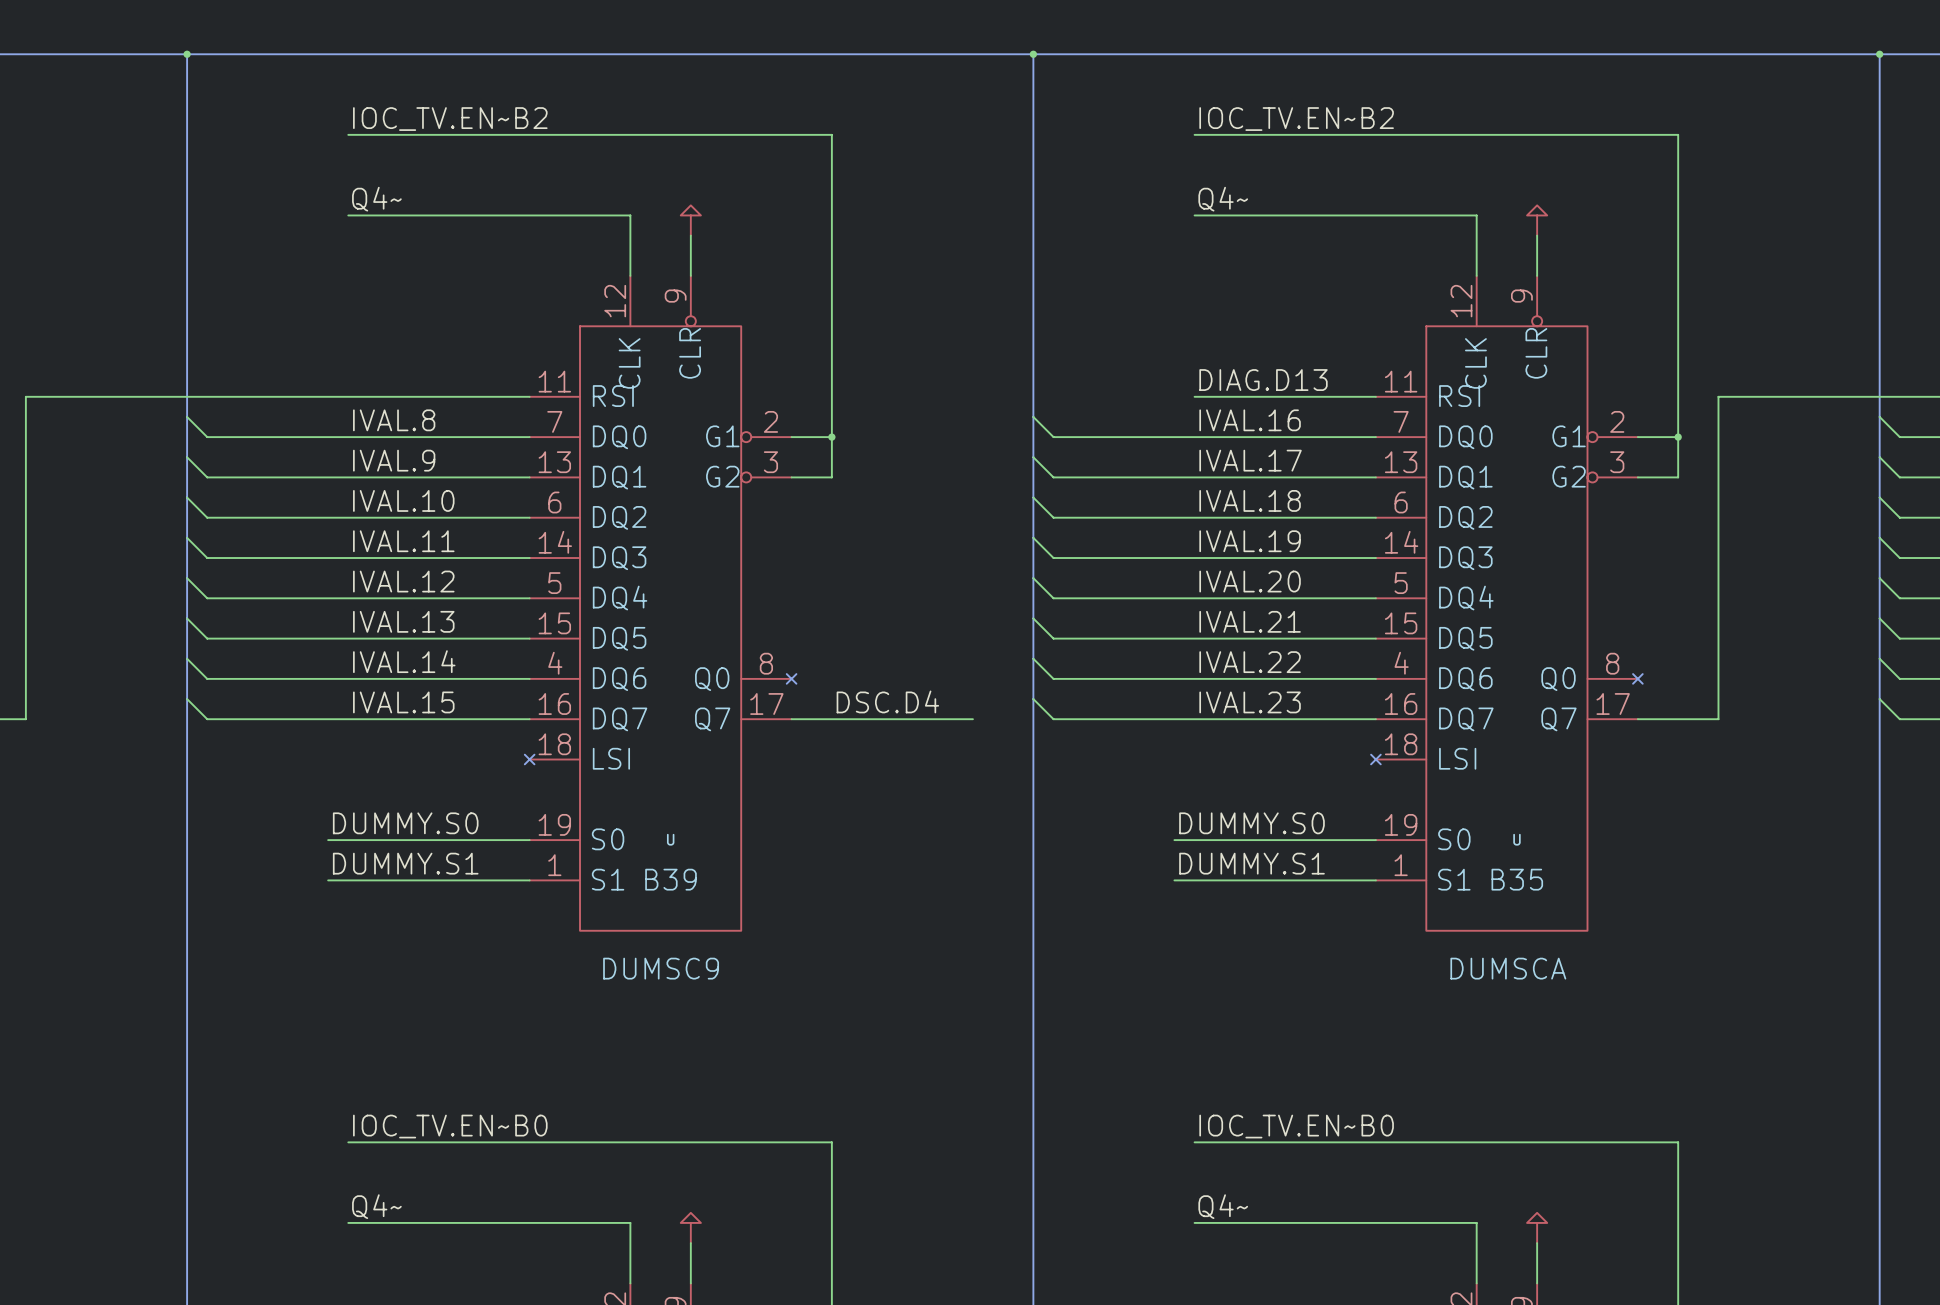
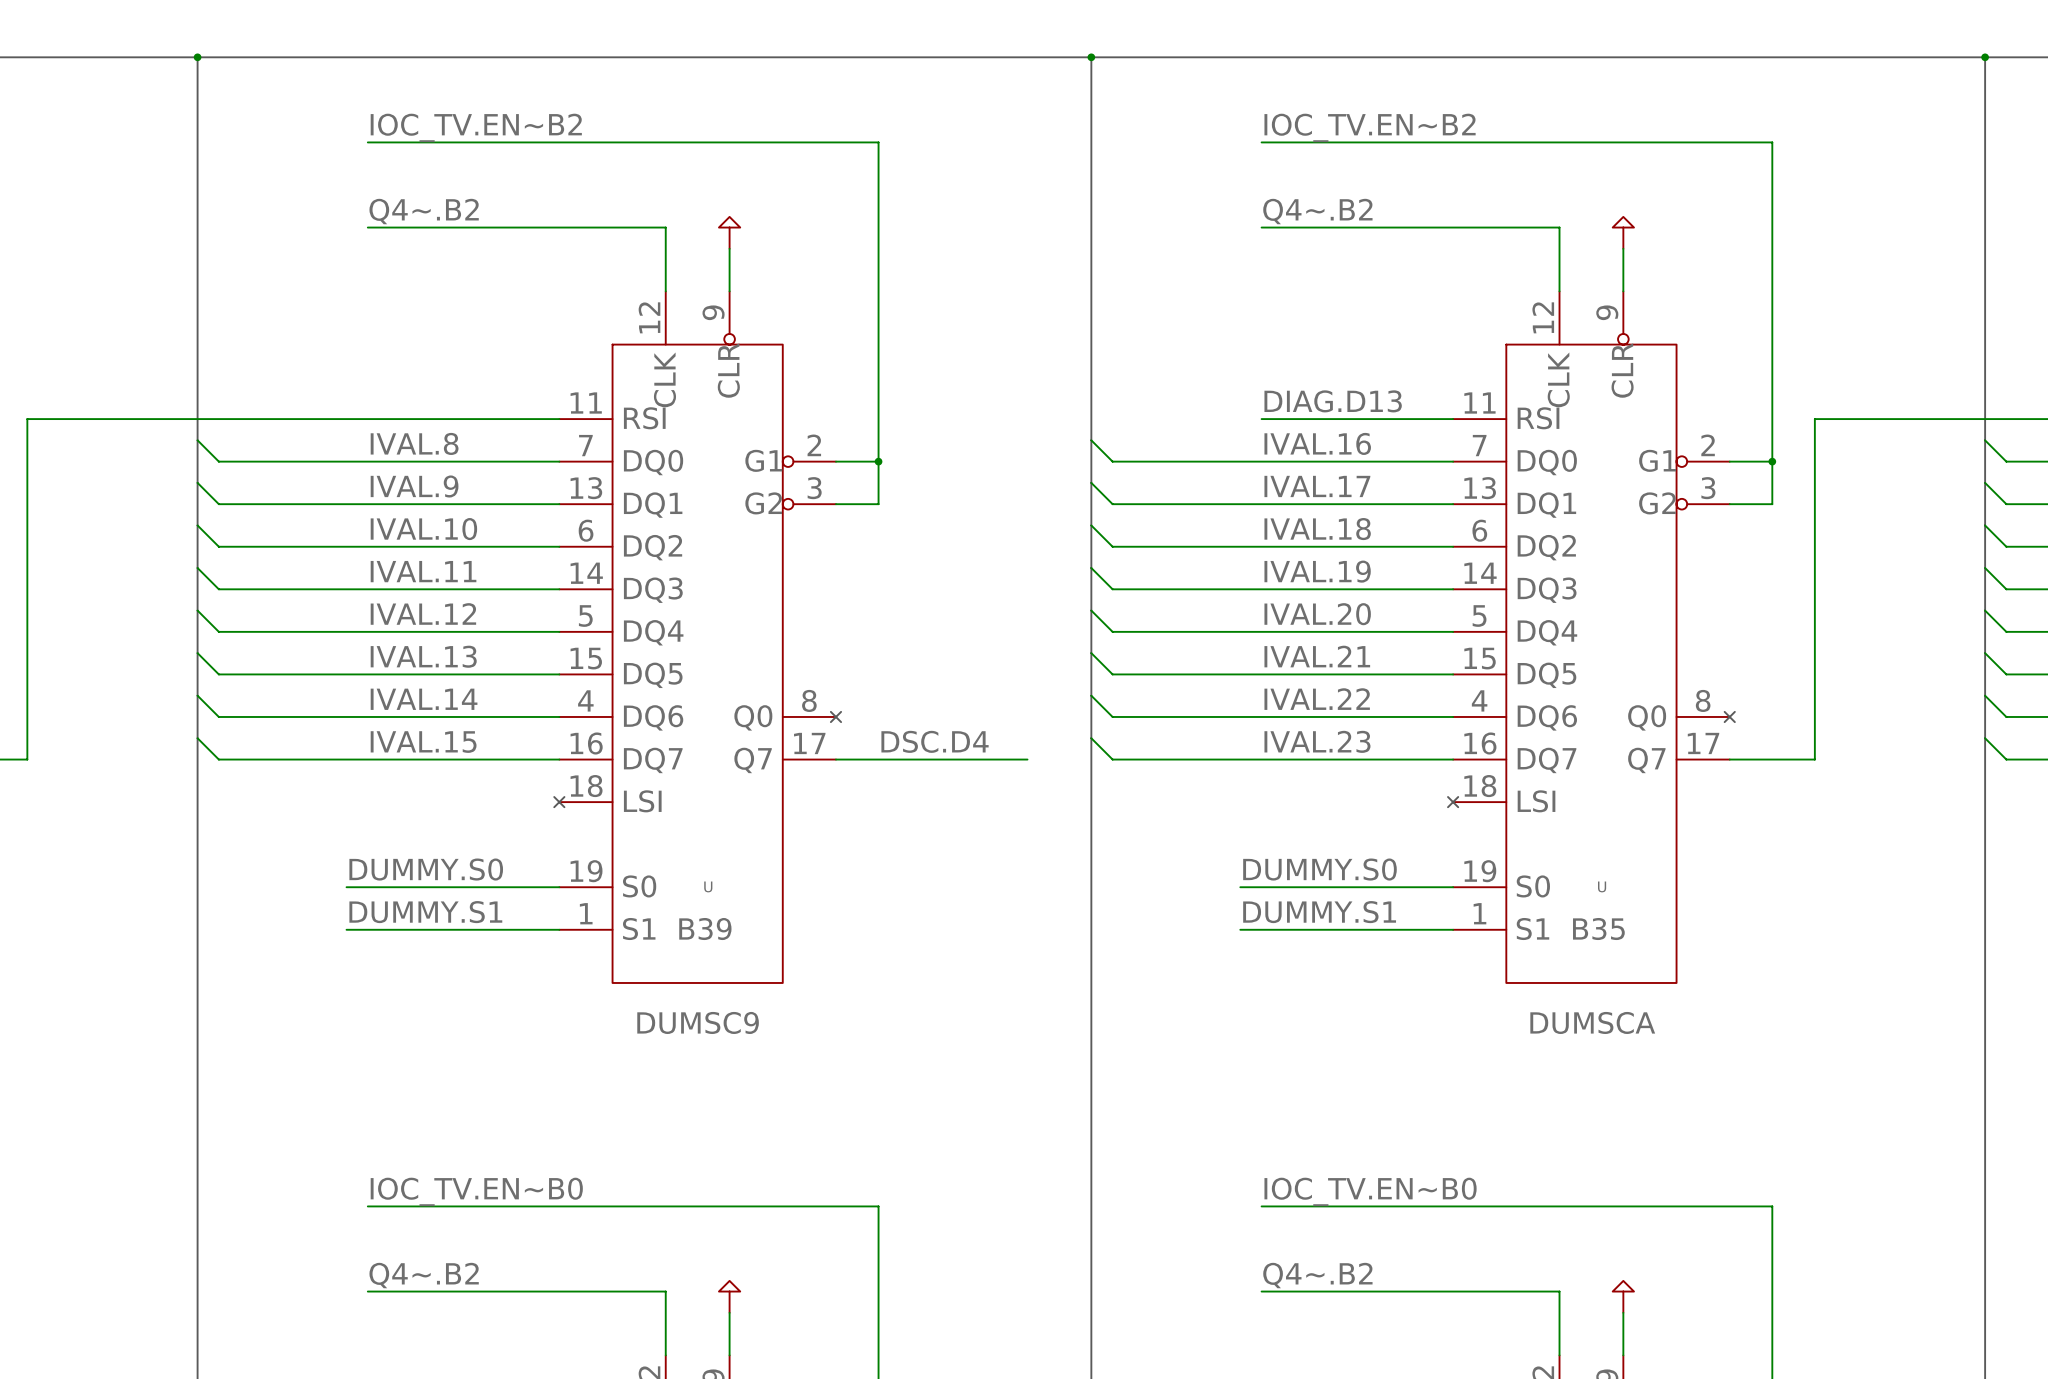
label: Q4~ (376, 199) -> Q4~.B2 (424, 211)
label: Q4~ (1223, 199) -> Q4~.B2 (1317, 211)
label: Q4~ (376, 1206) -> Q4~.B2 (424, 1275)
label: Q4~ (1223, 1206) -> Q4~.B2 (1317, 1275)

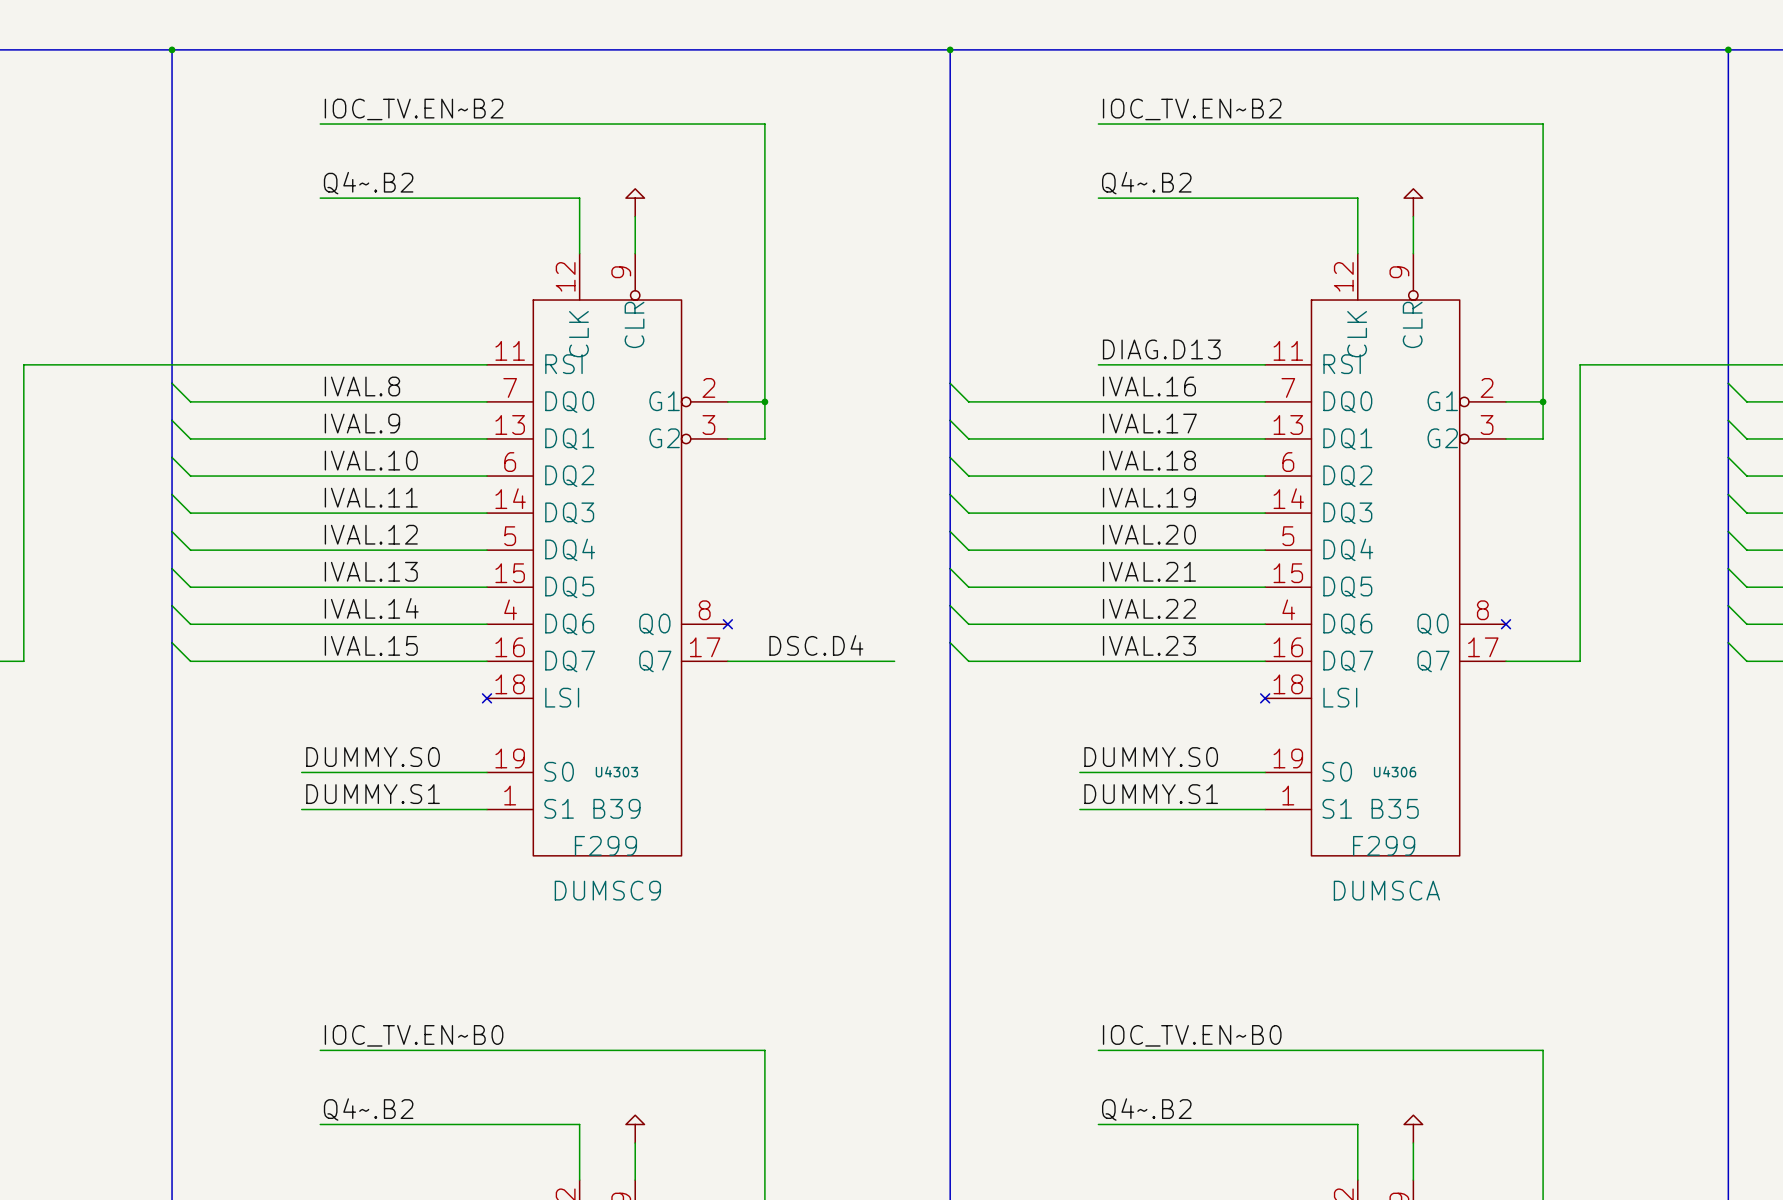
U name: U (708, 886) -> U4303 (616, 771)
U name: U (1602, 886) -> U4306 (1395, 771)
U value: none -> F299 (605, 845)
U value: none -> F299 (1384, 845)

